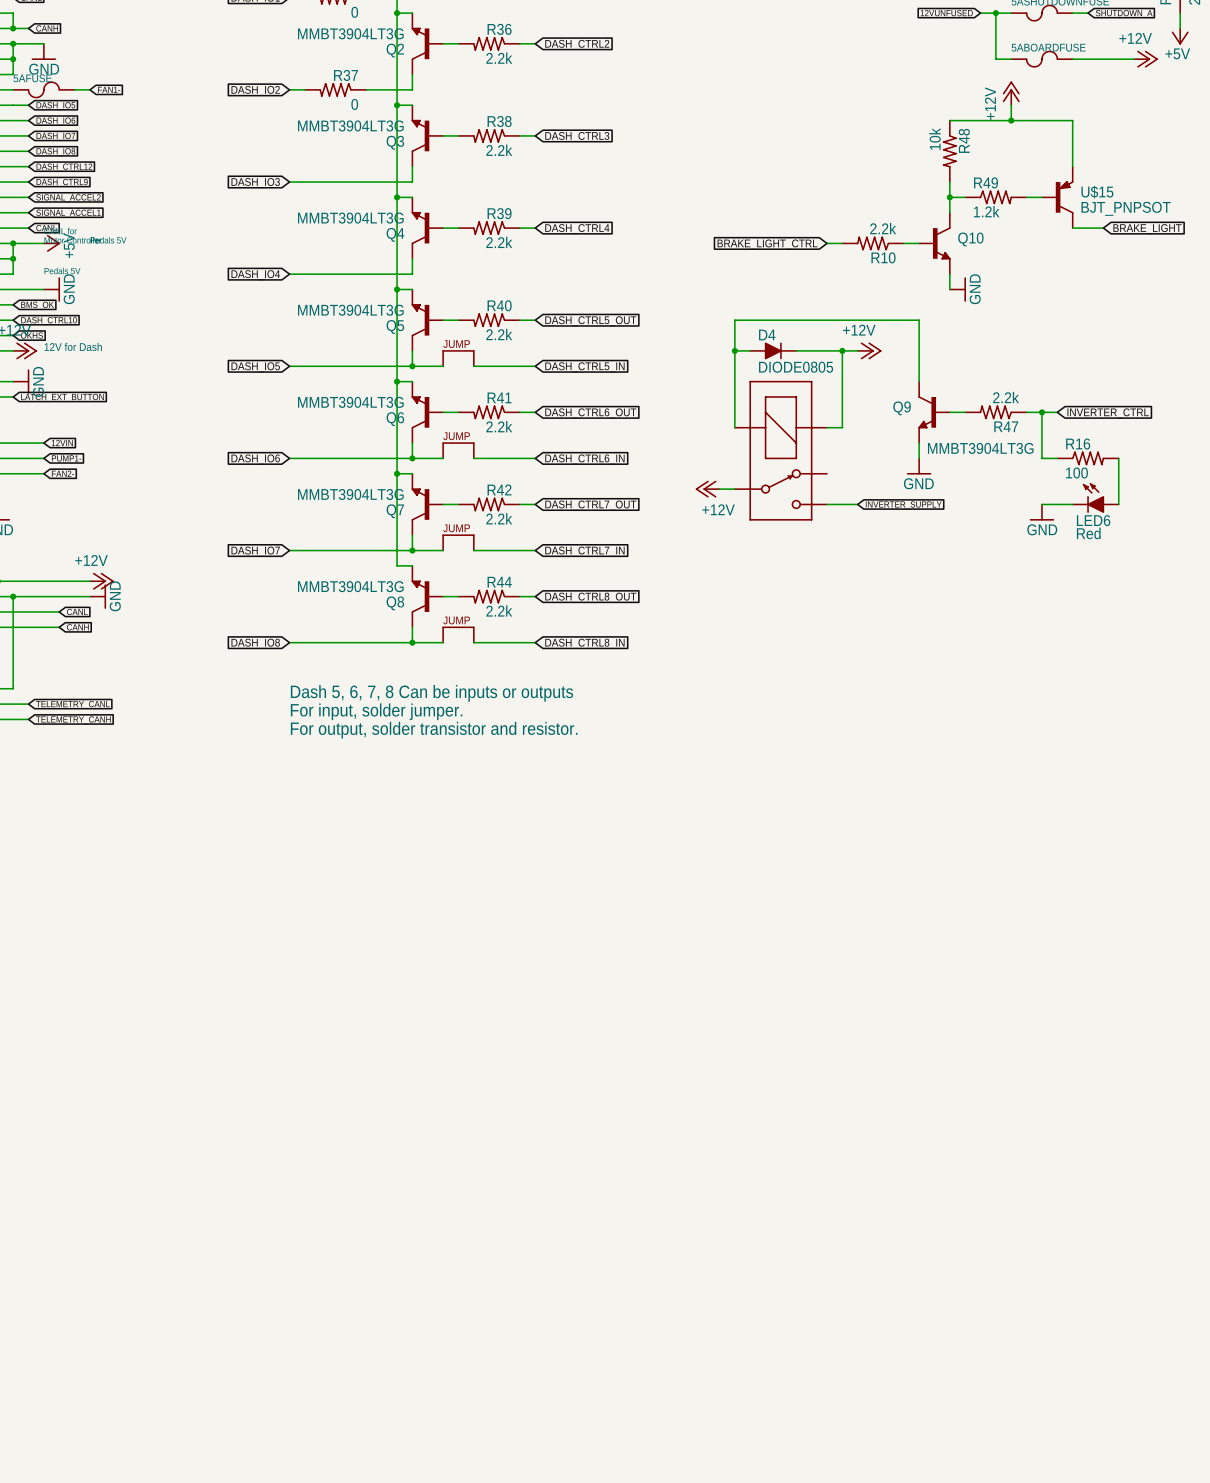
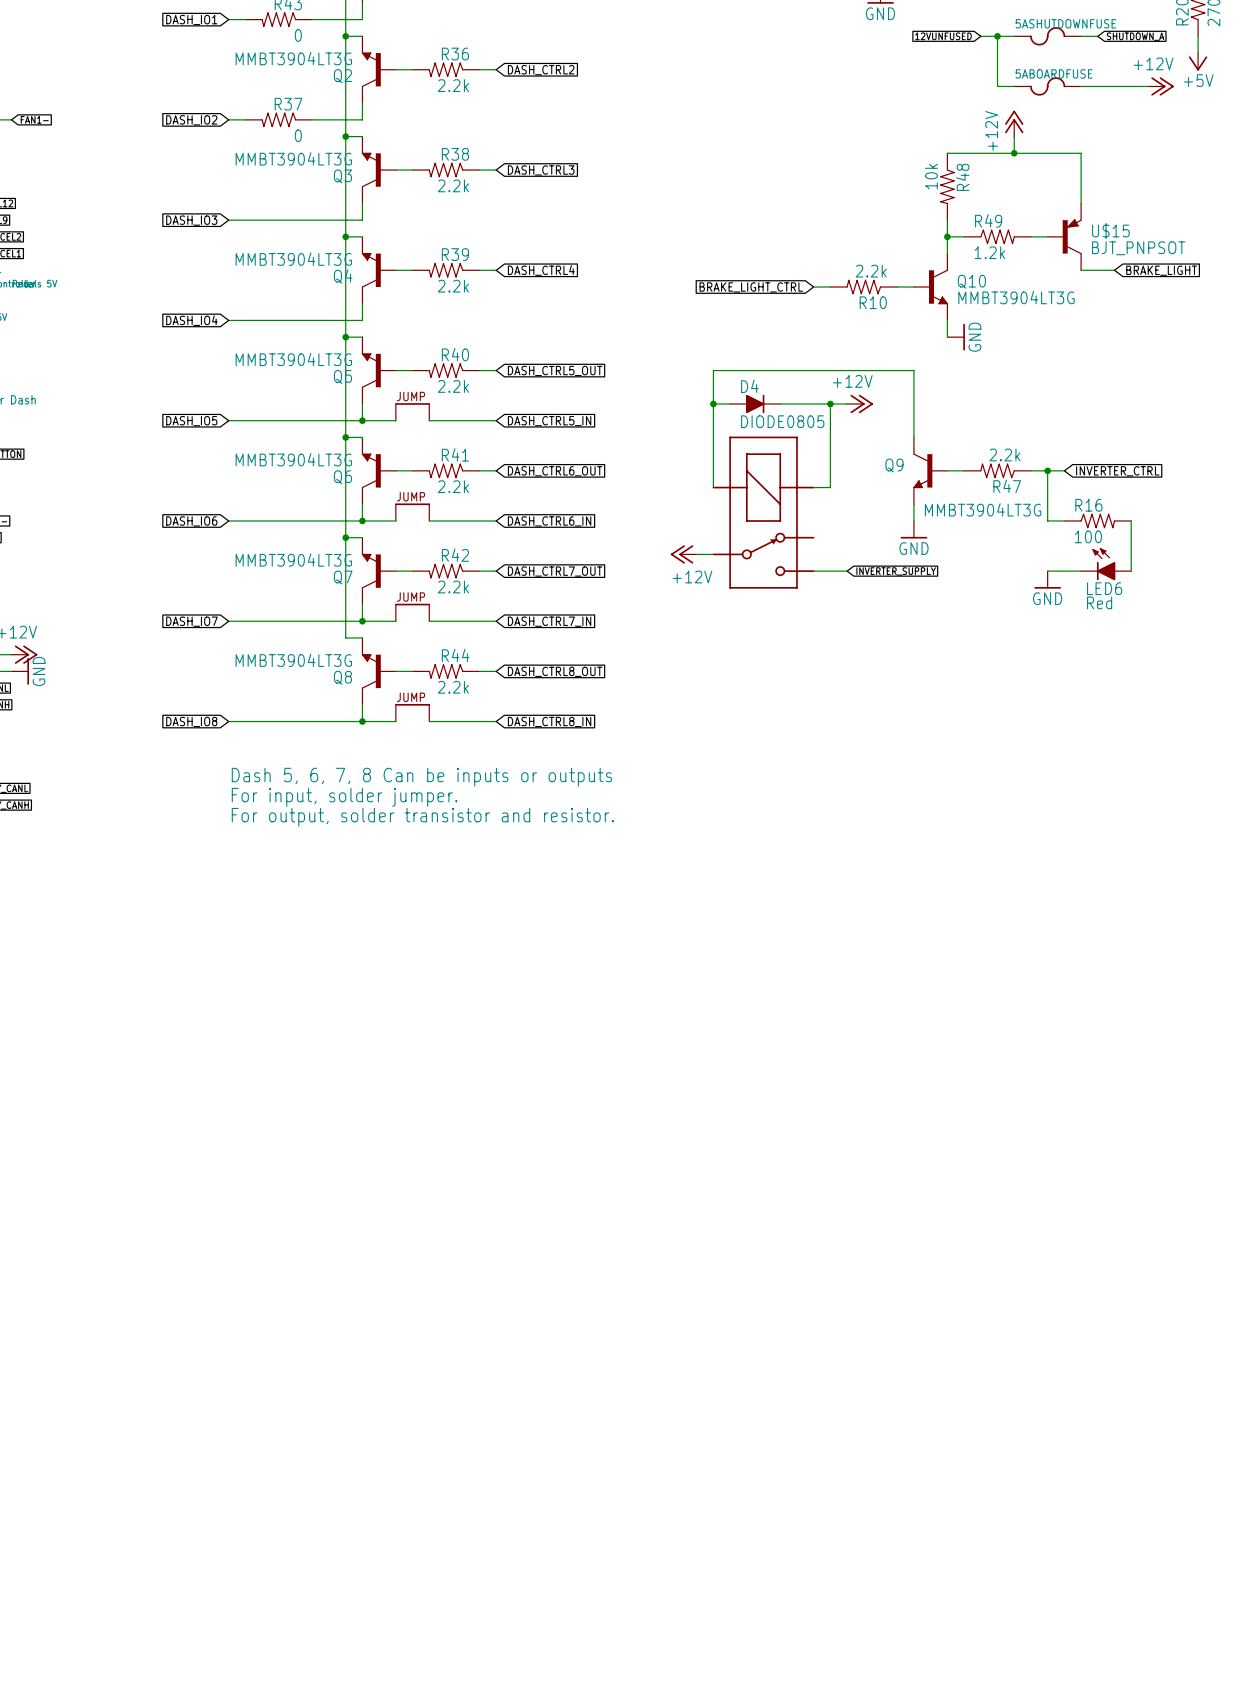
Q10 value: none -> MMBT3904LT3G (1016, 297)

